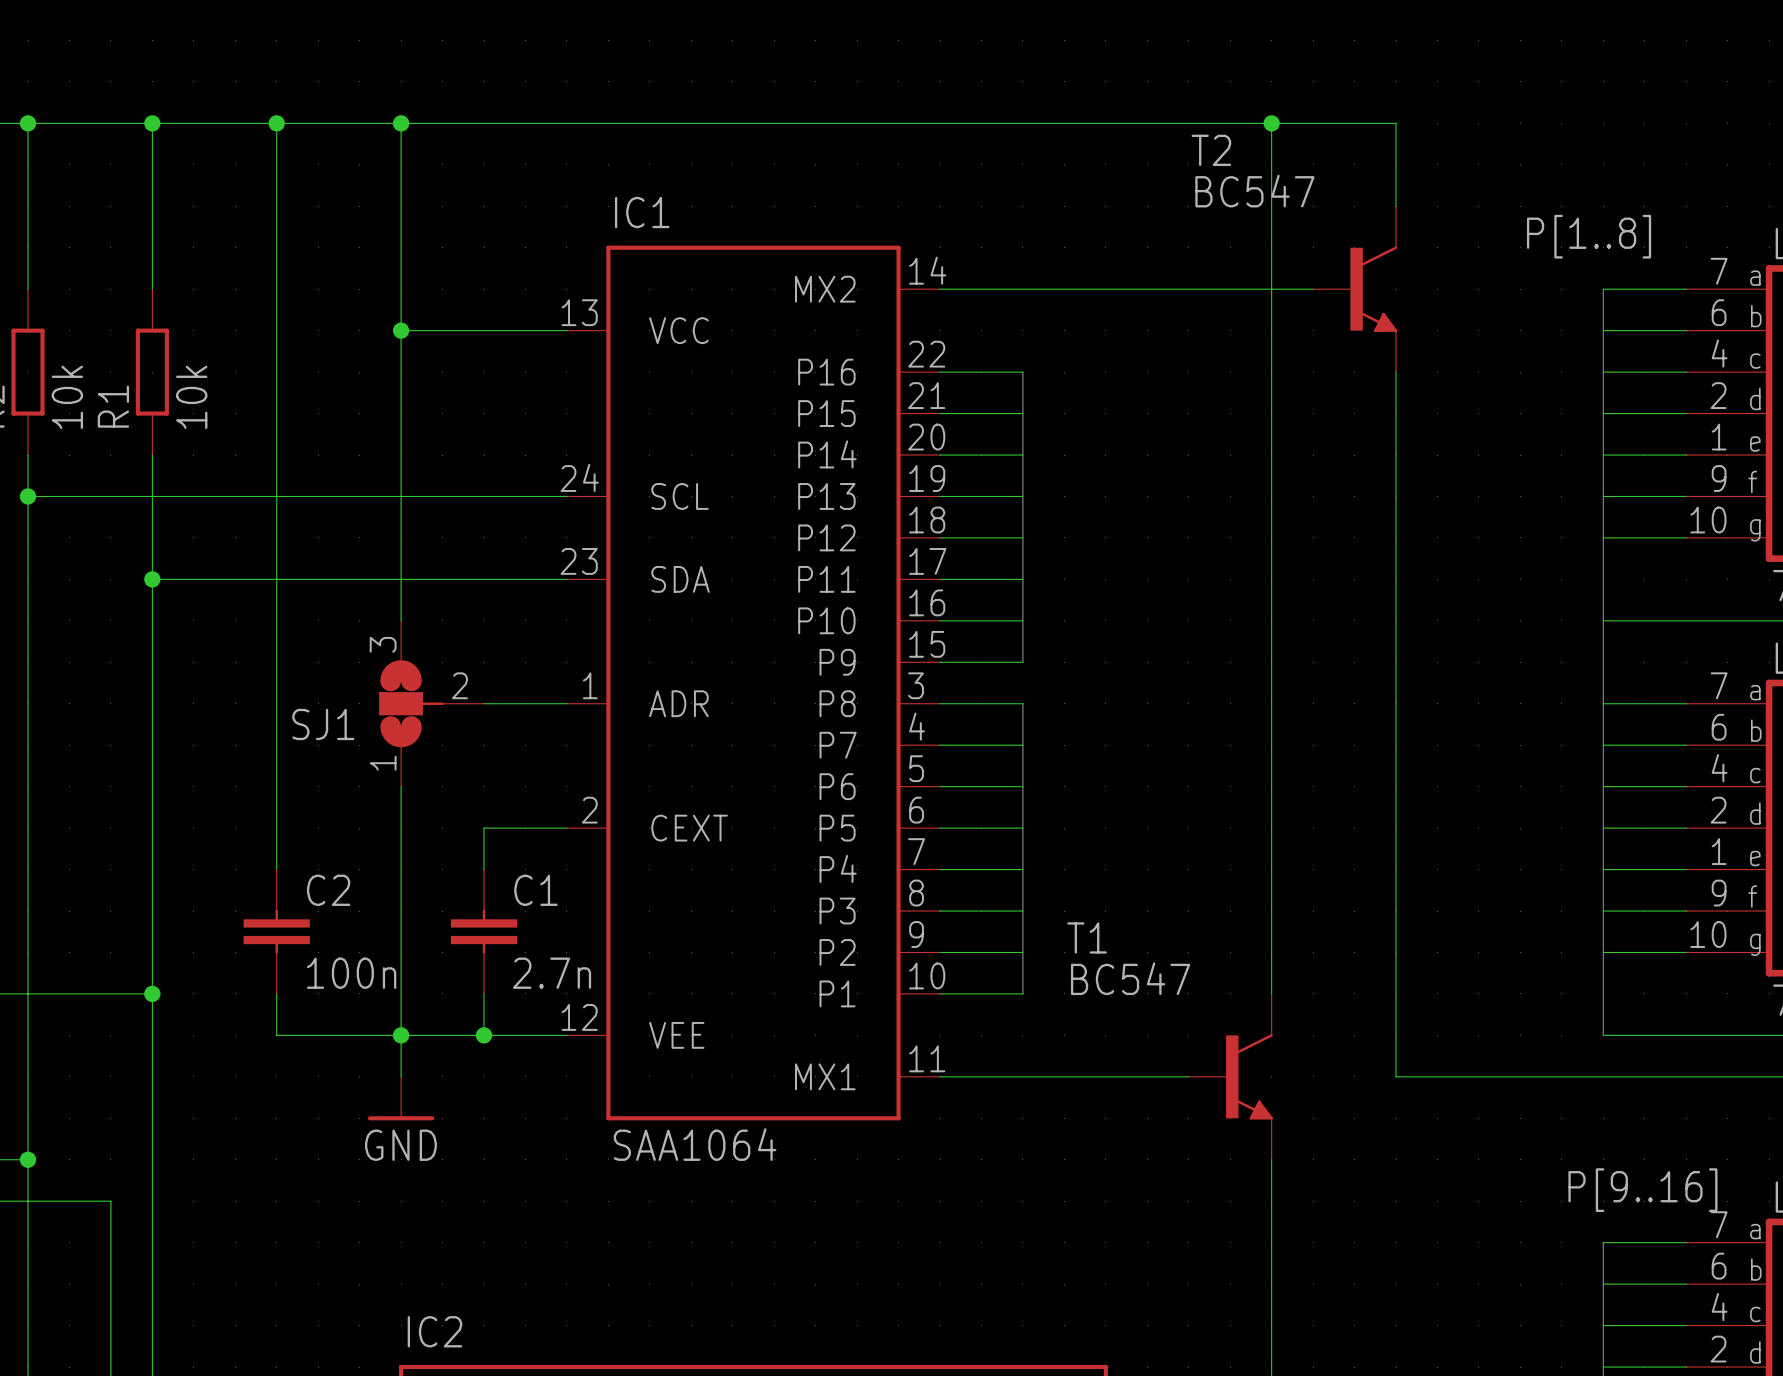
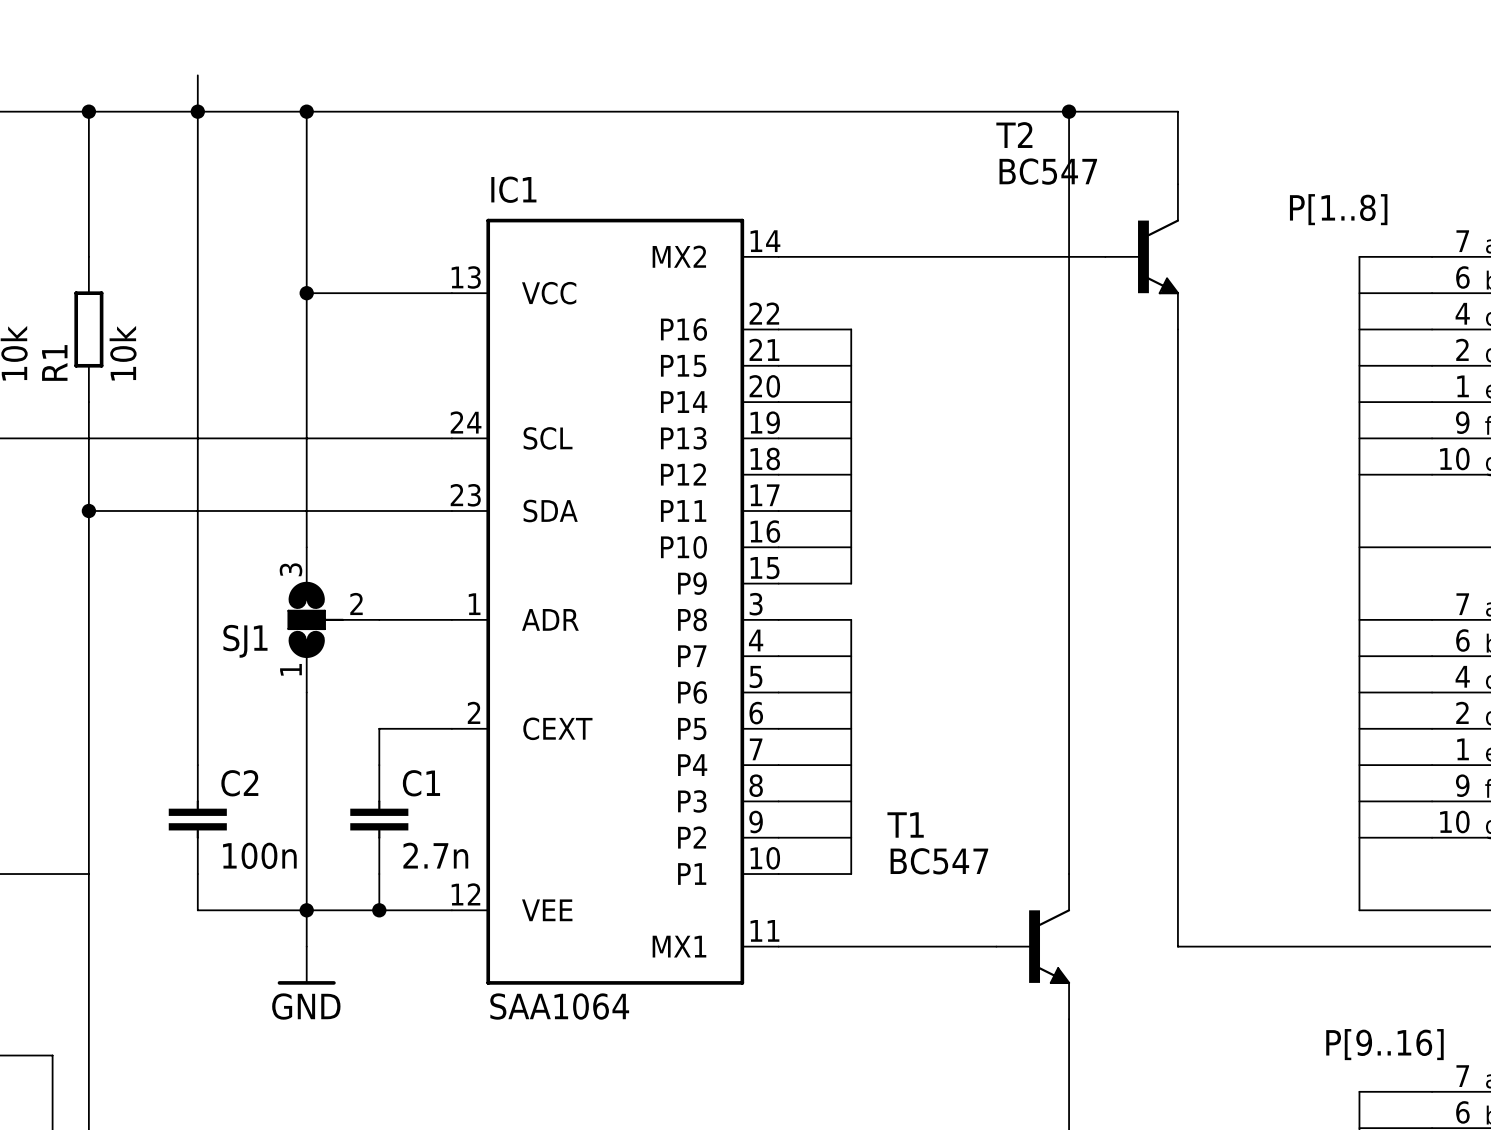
wire: none -> (197, 75) (197, 111)
junction: (152, 993) -> none

